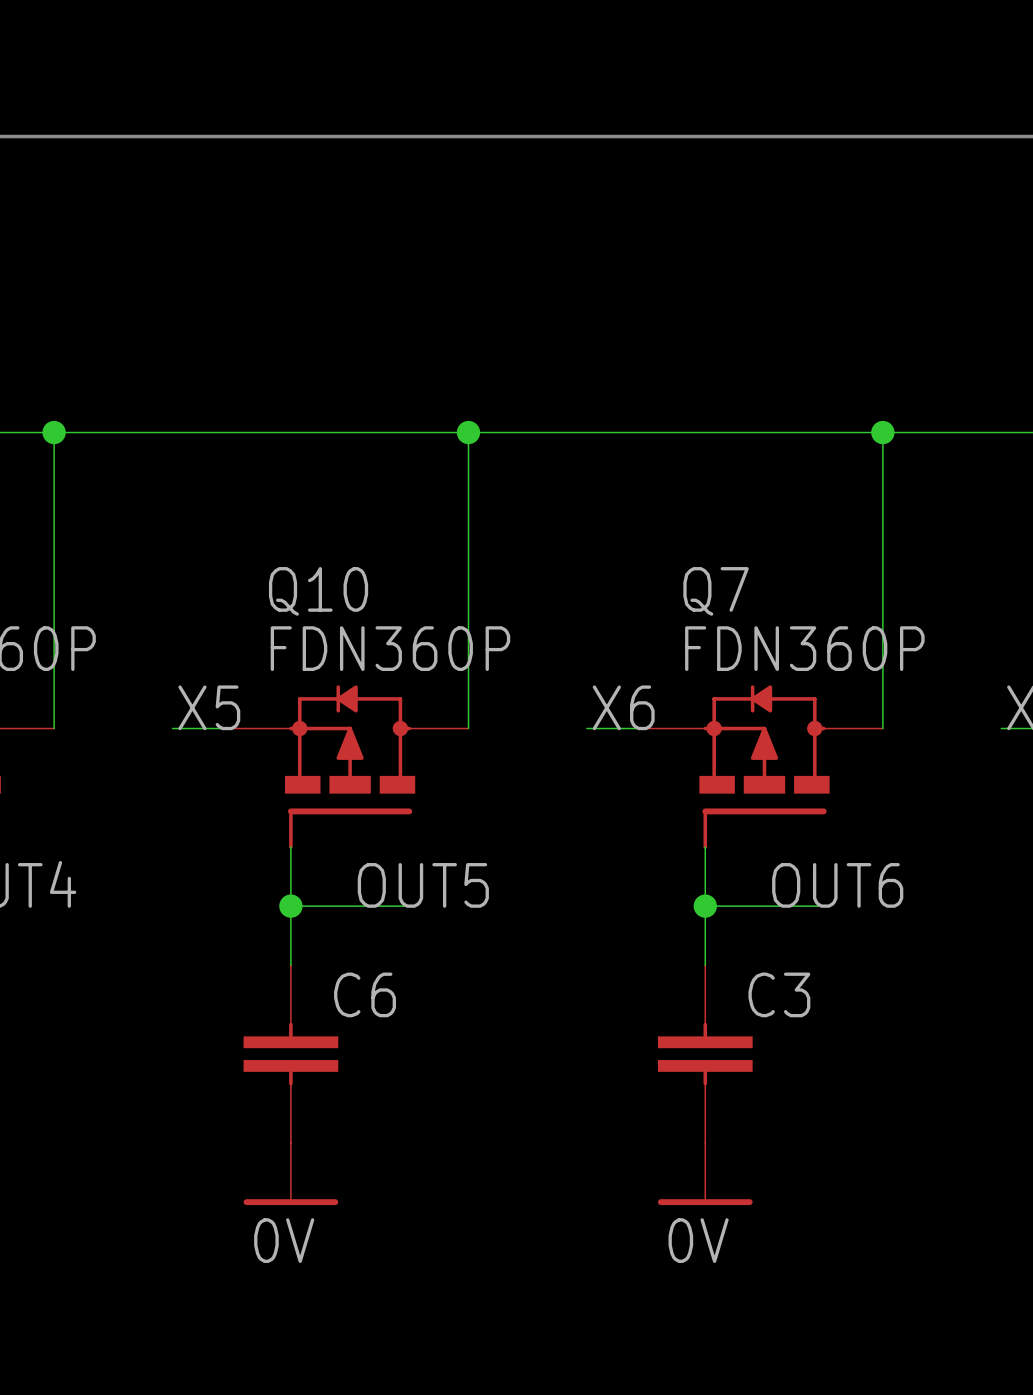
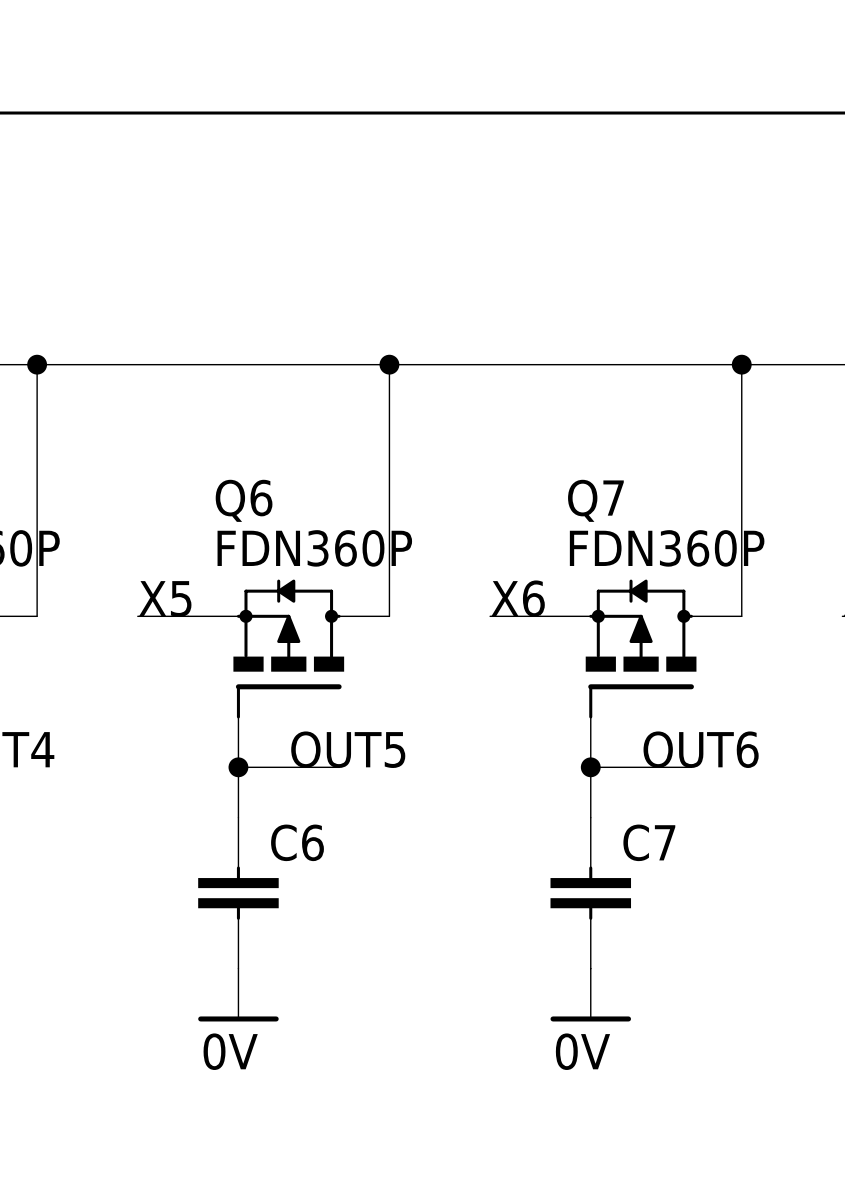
Q10 name: Q10 (318, 591) -> Q6 (244, 500)
C3 name: C3 (779, 994) -> C7 (649, 842)

